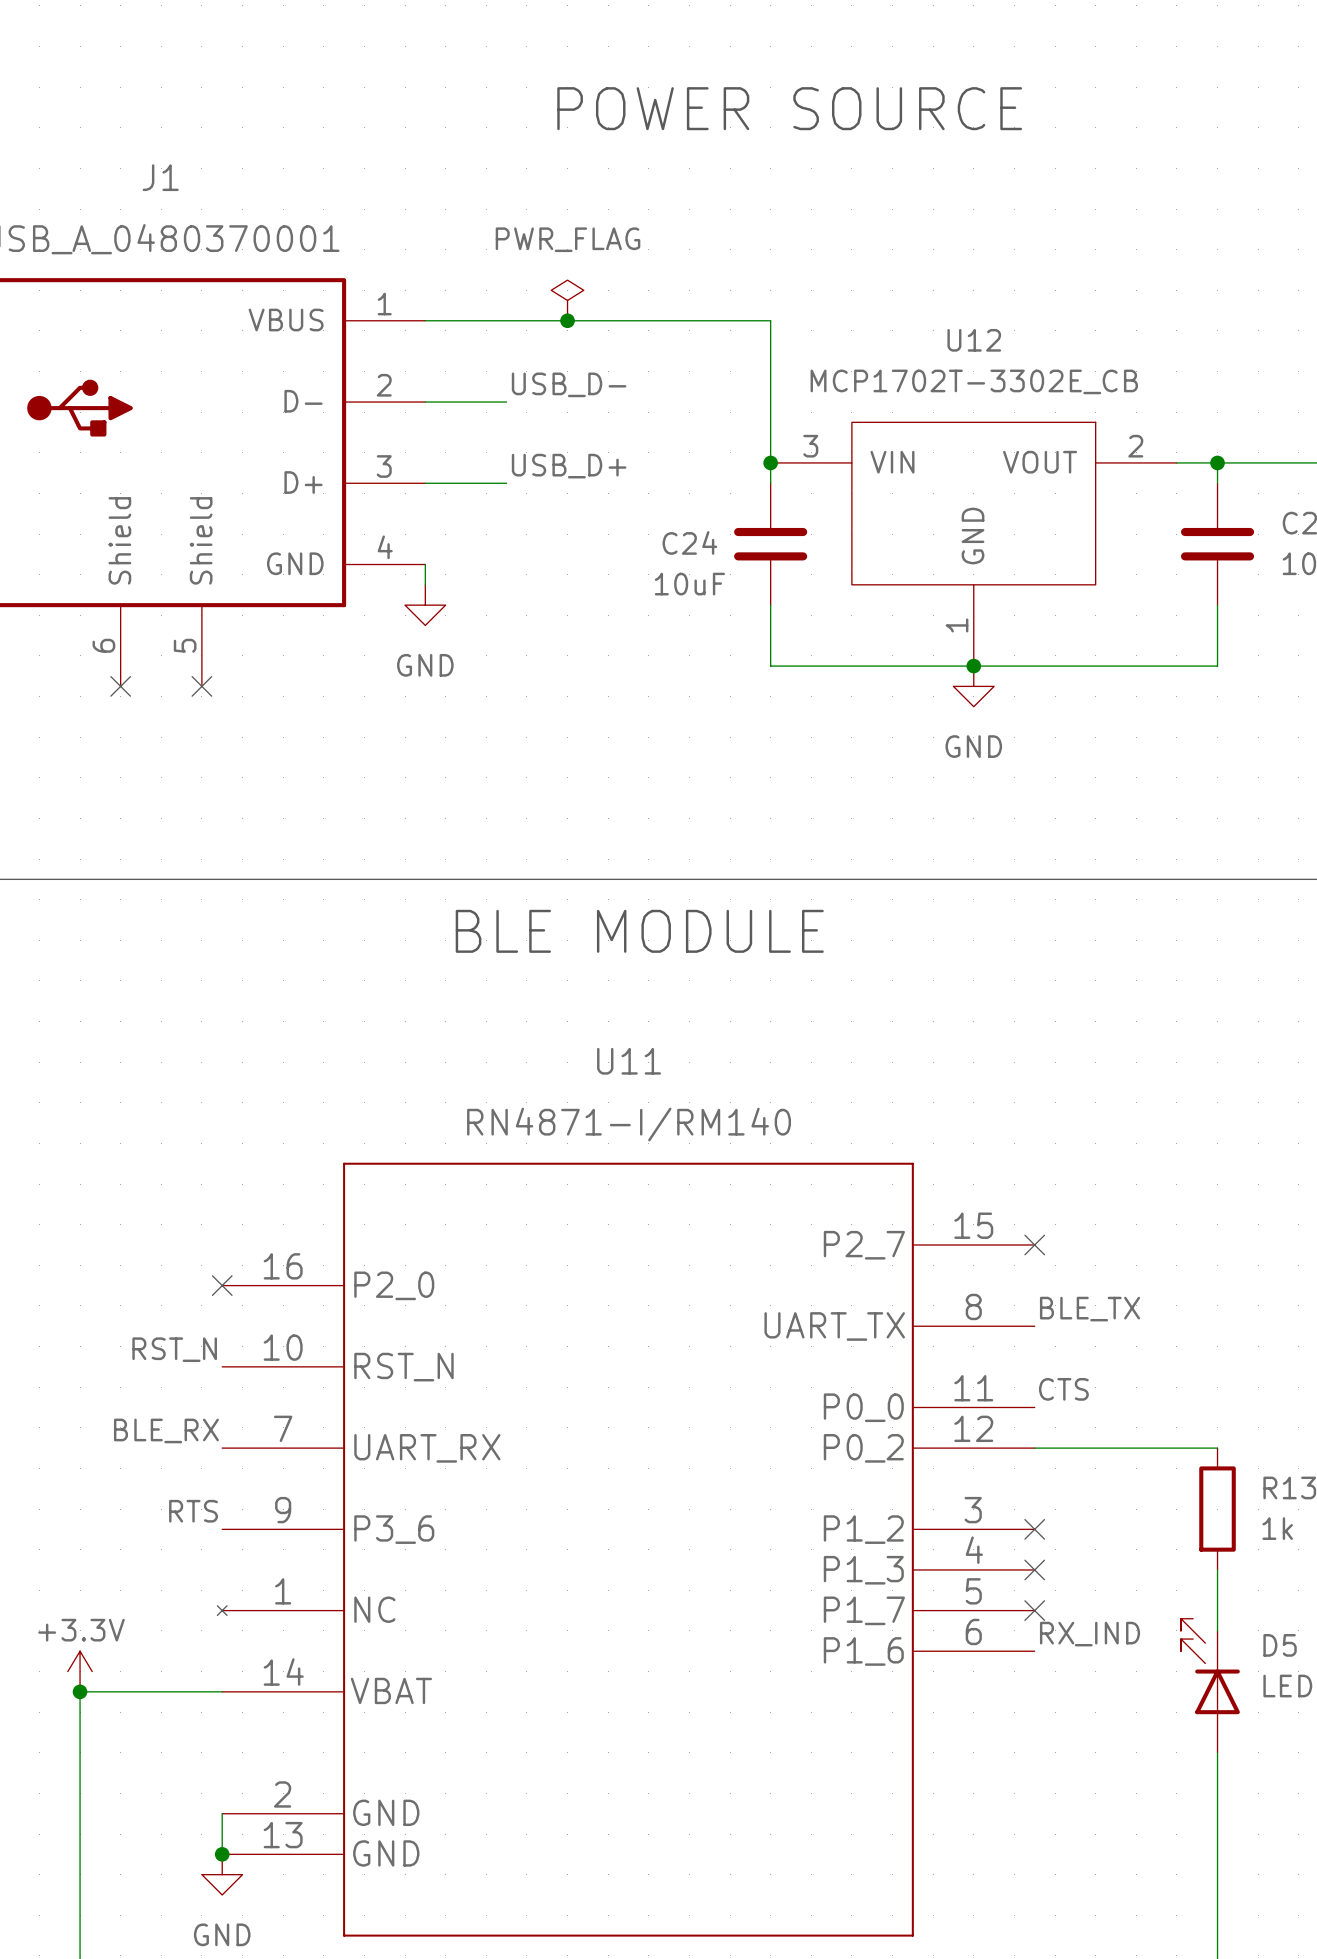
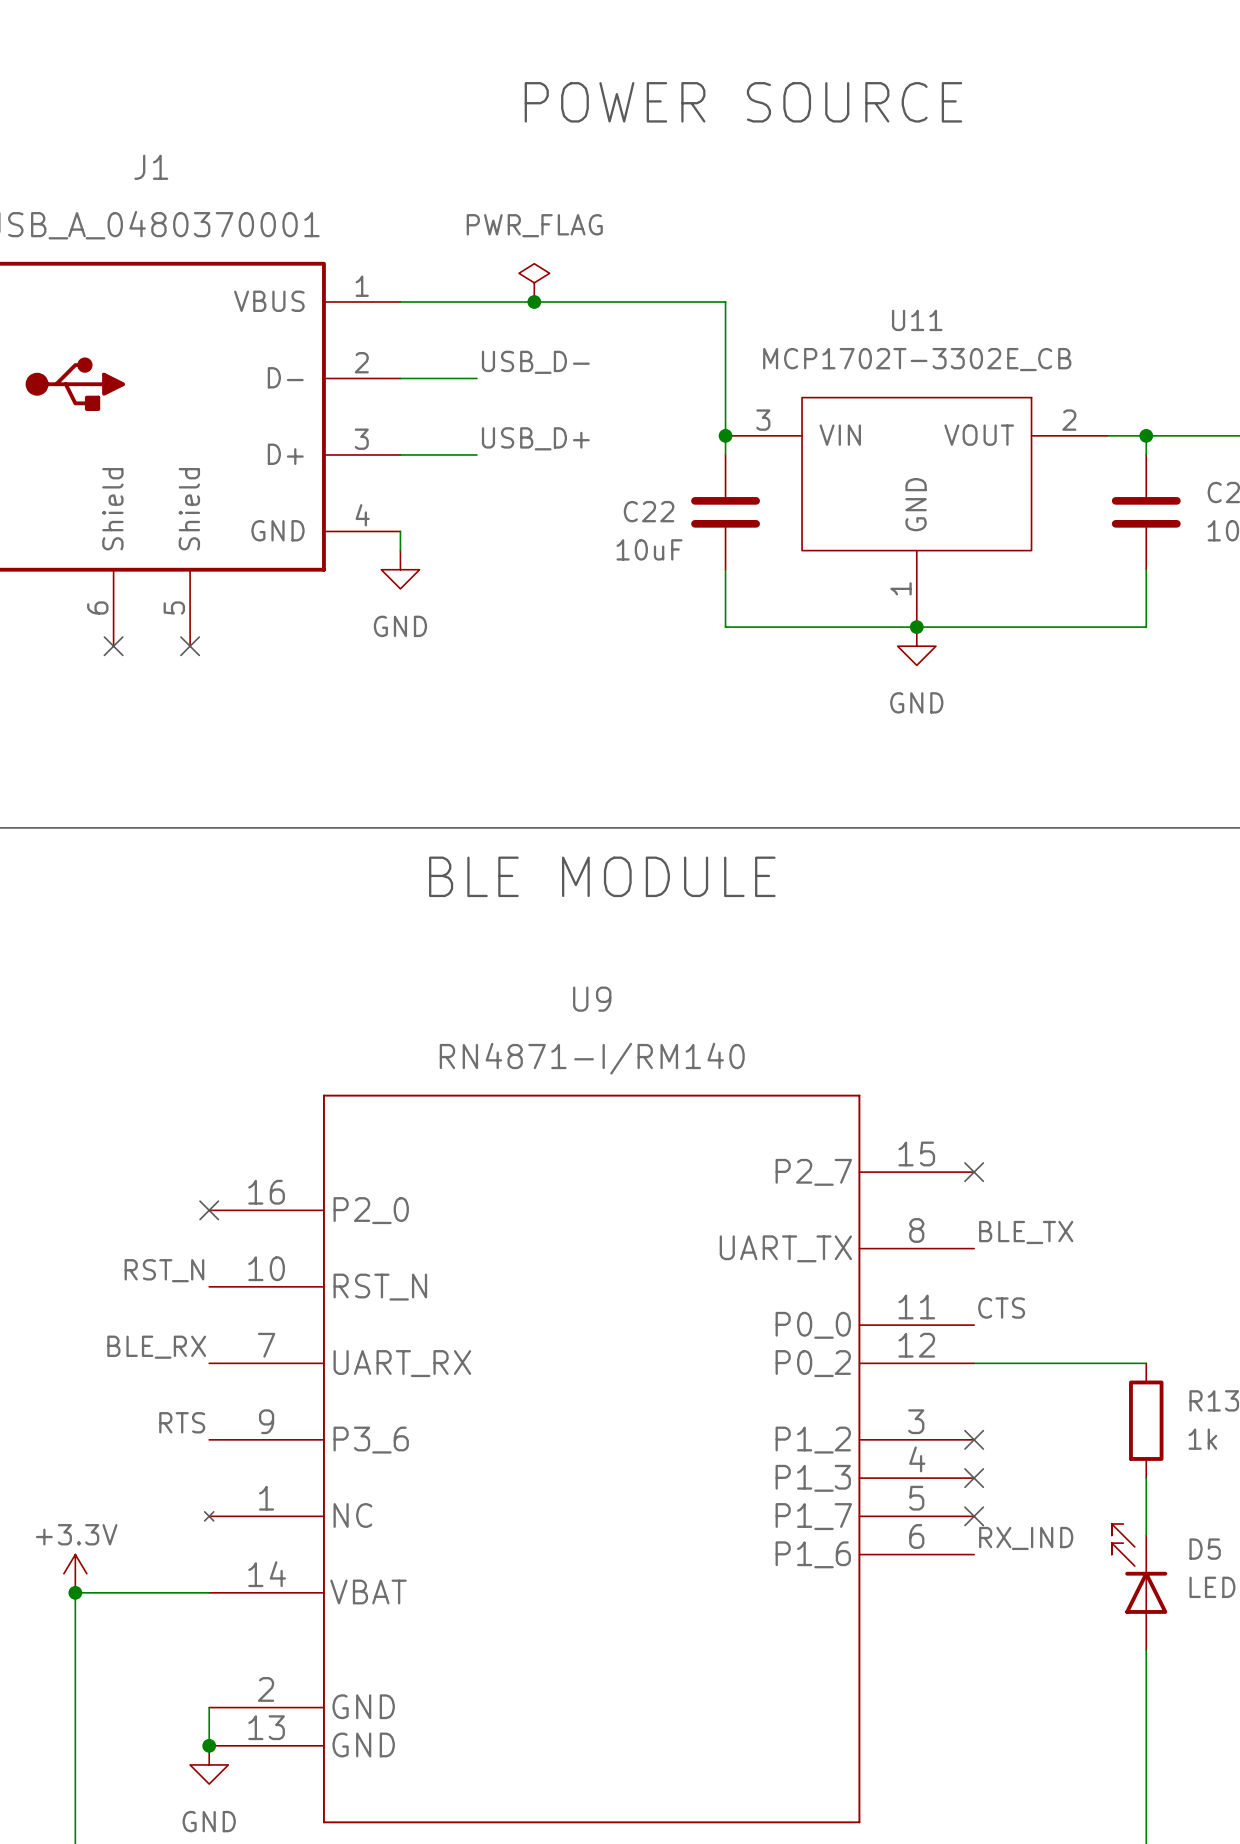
U12 name: U12 (974, 340) -> U11 (917, 320)
C24 name: C24 (689, 542) -> C22 (649, 511)
U11 name: U11 (629, 1061) -> U9 (592, 999)

